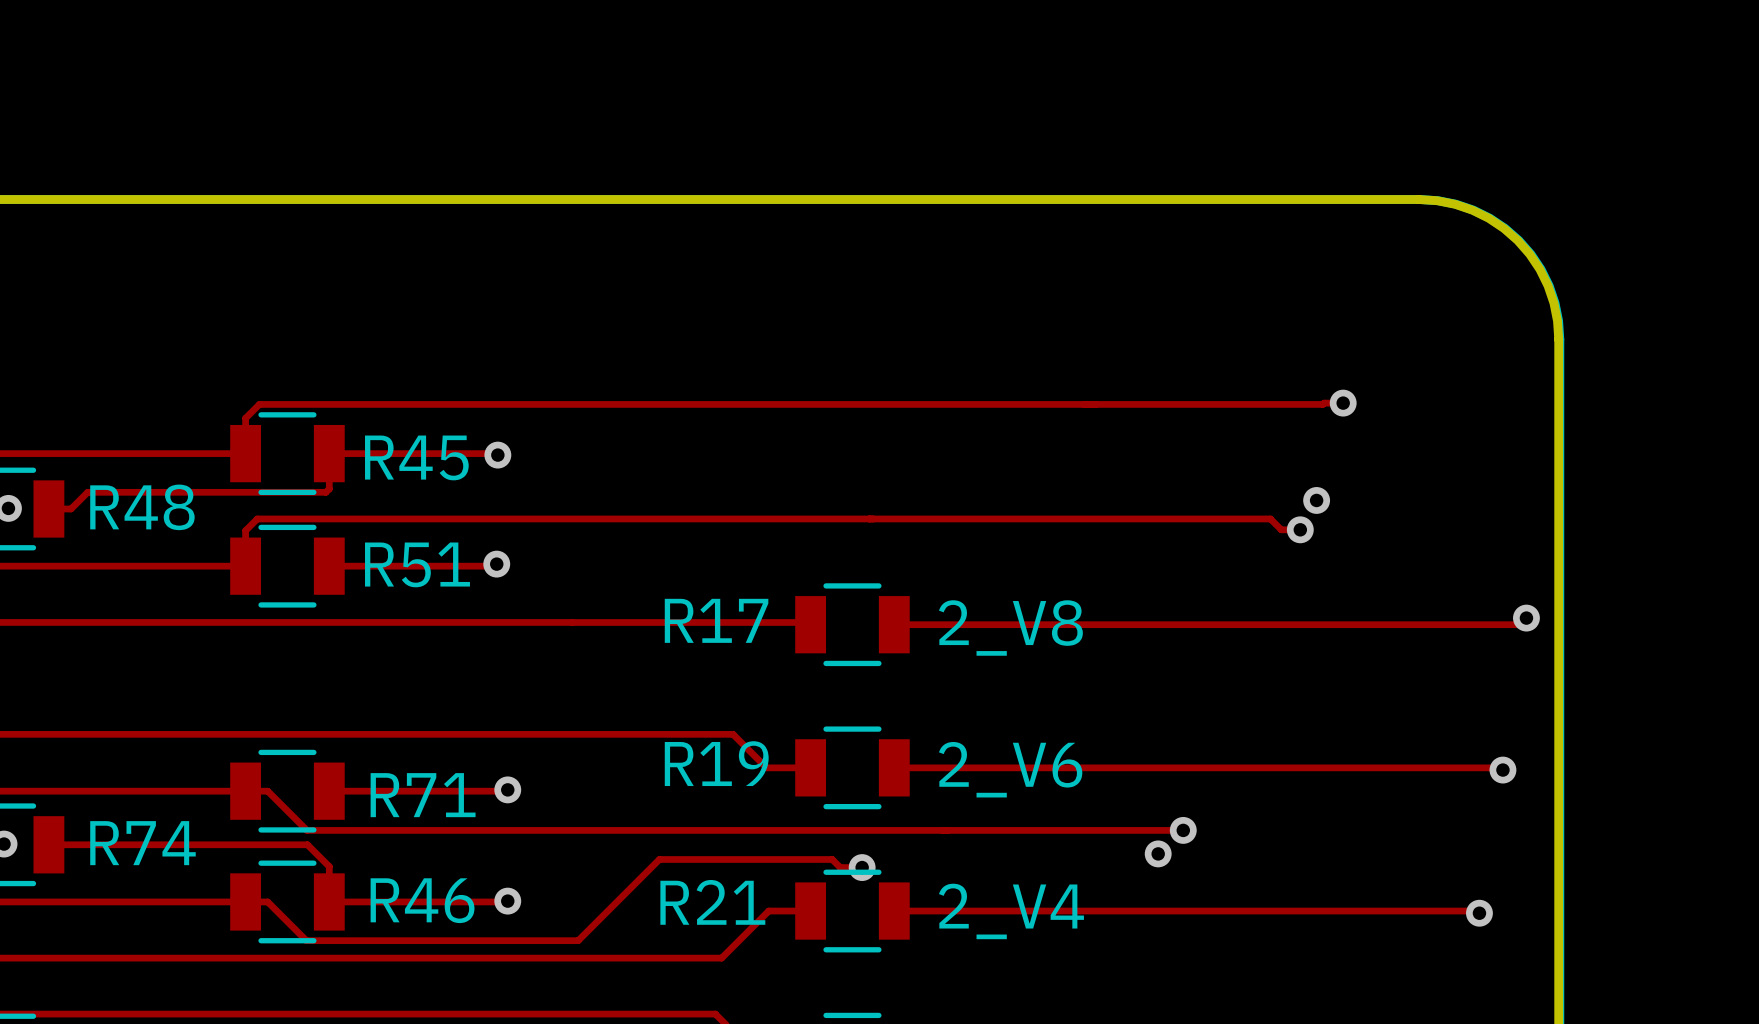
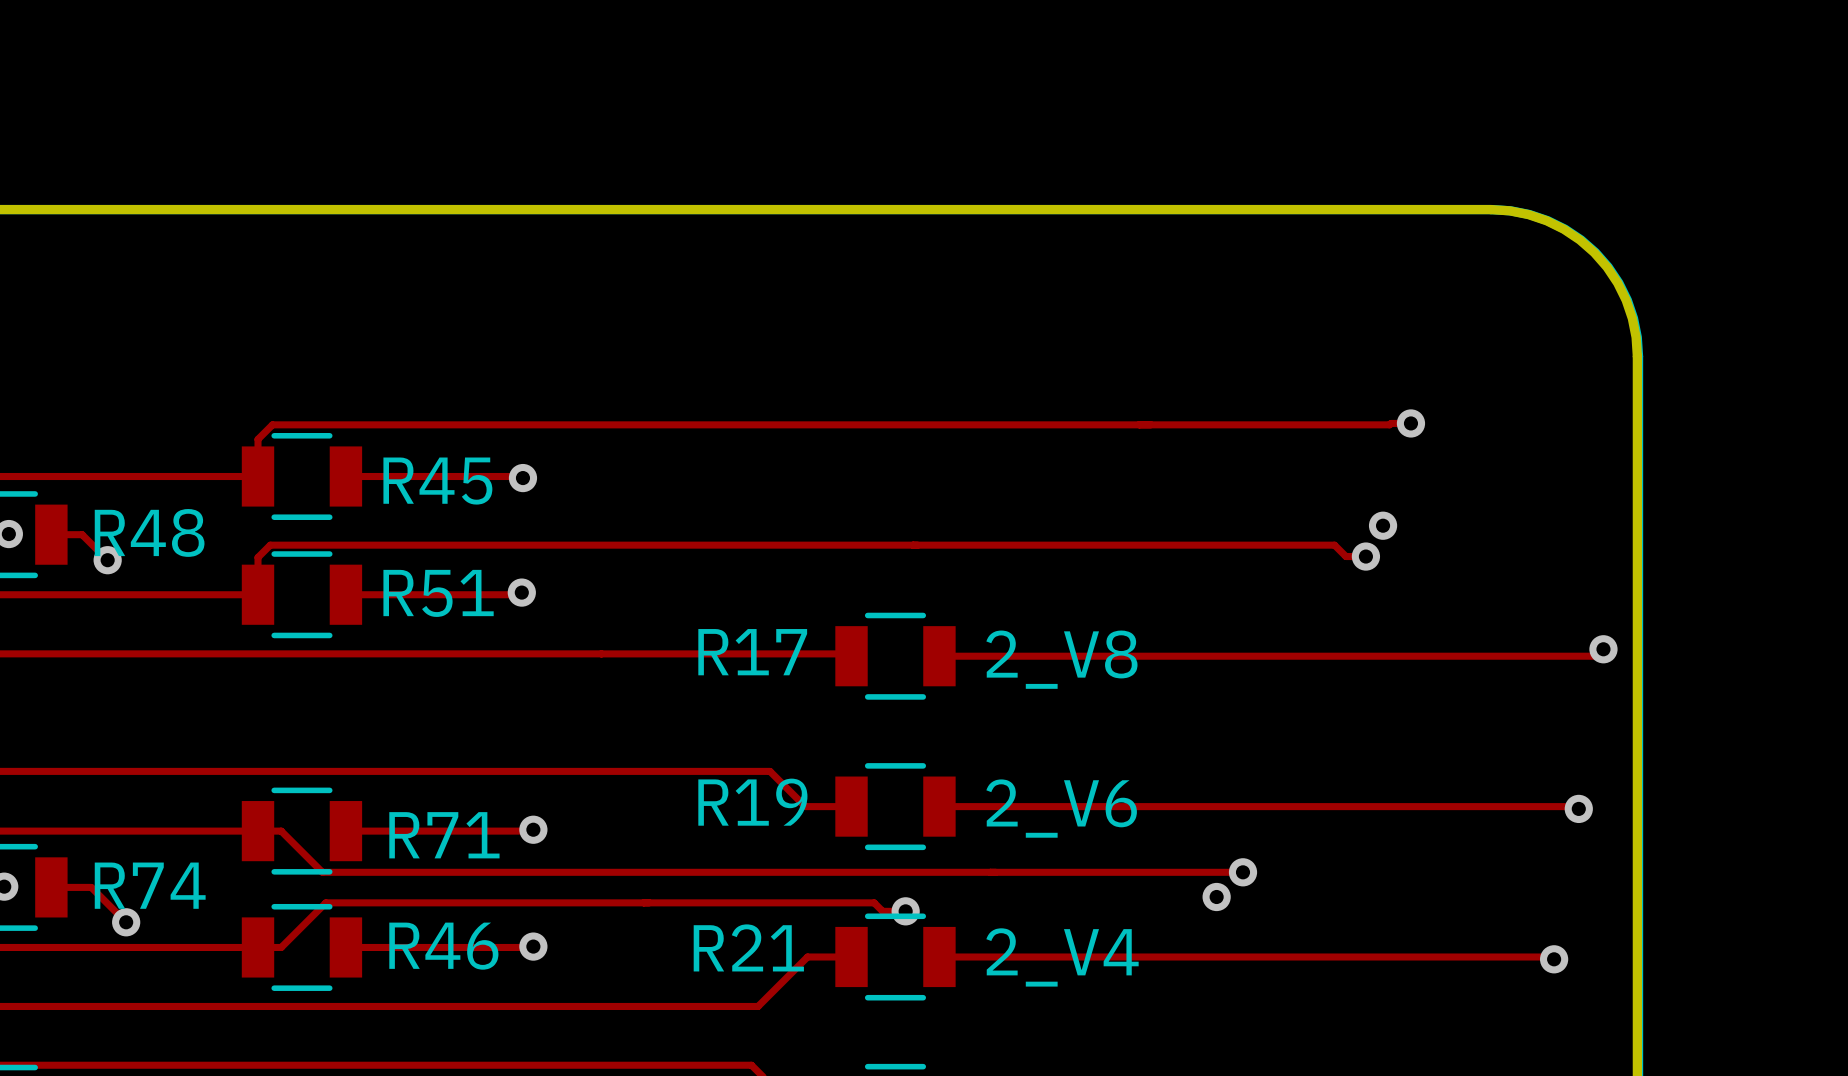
track: (329, 453) (329, 488) (325, 492) (87, 492) (71, 508) -> (107, 560) (82, 534) (74, 534)
via: none -> (107, 560)
track: (86, 844) (307, 844) (329, 866) (329, 901) -> (91, 887) (126, 922)
track: (659, 859) (578, 940) (306, 940) (267, 901) -> (692, 902) (325, 902) (281, 947)
via: none -> (126, 922)

